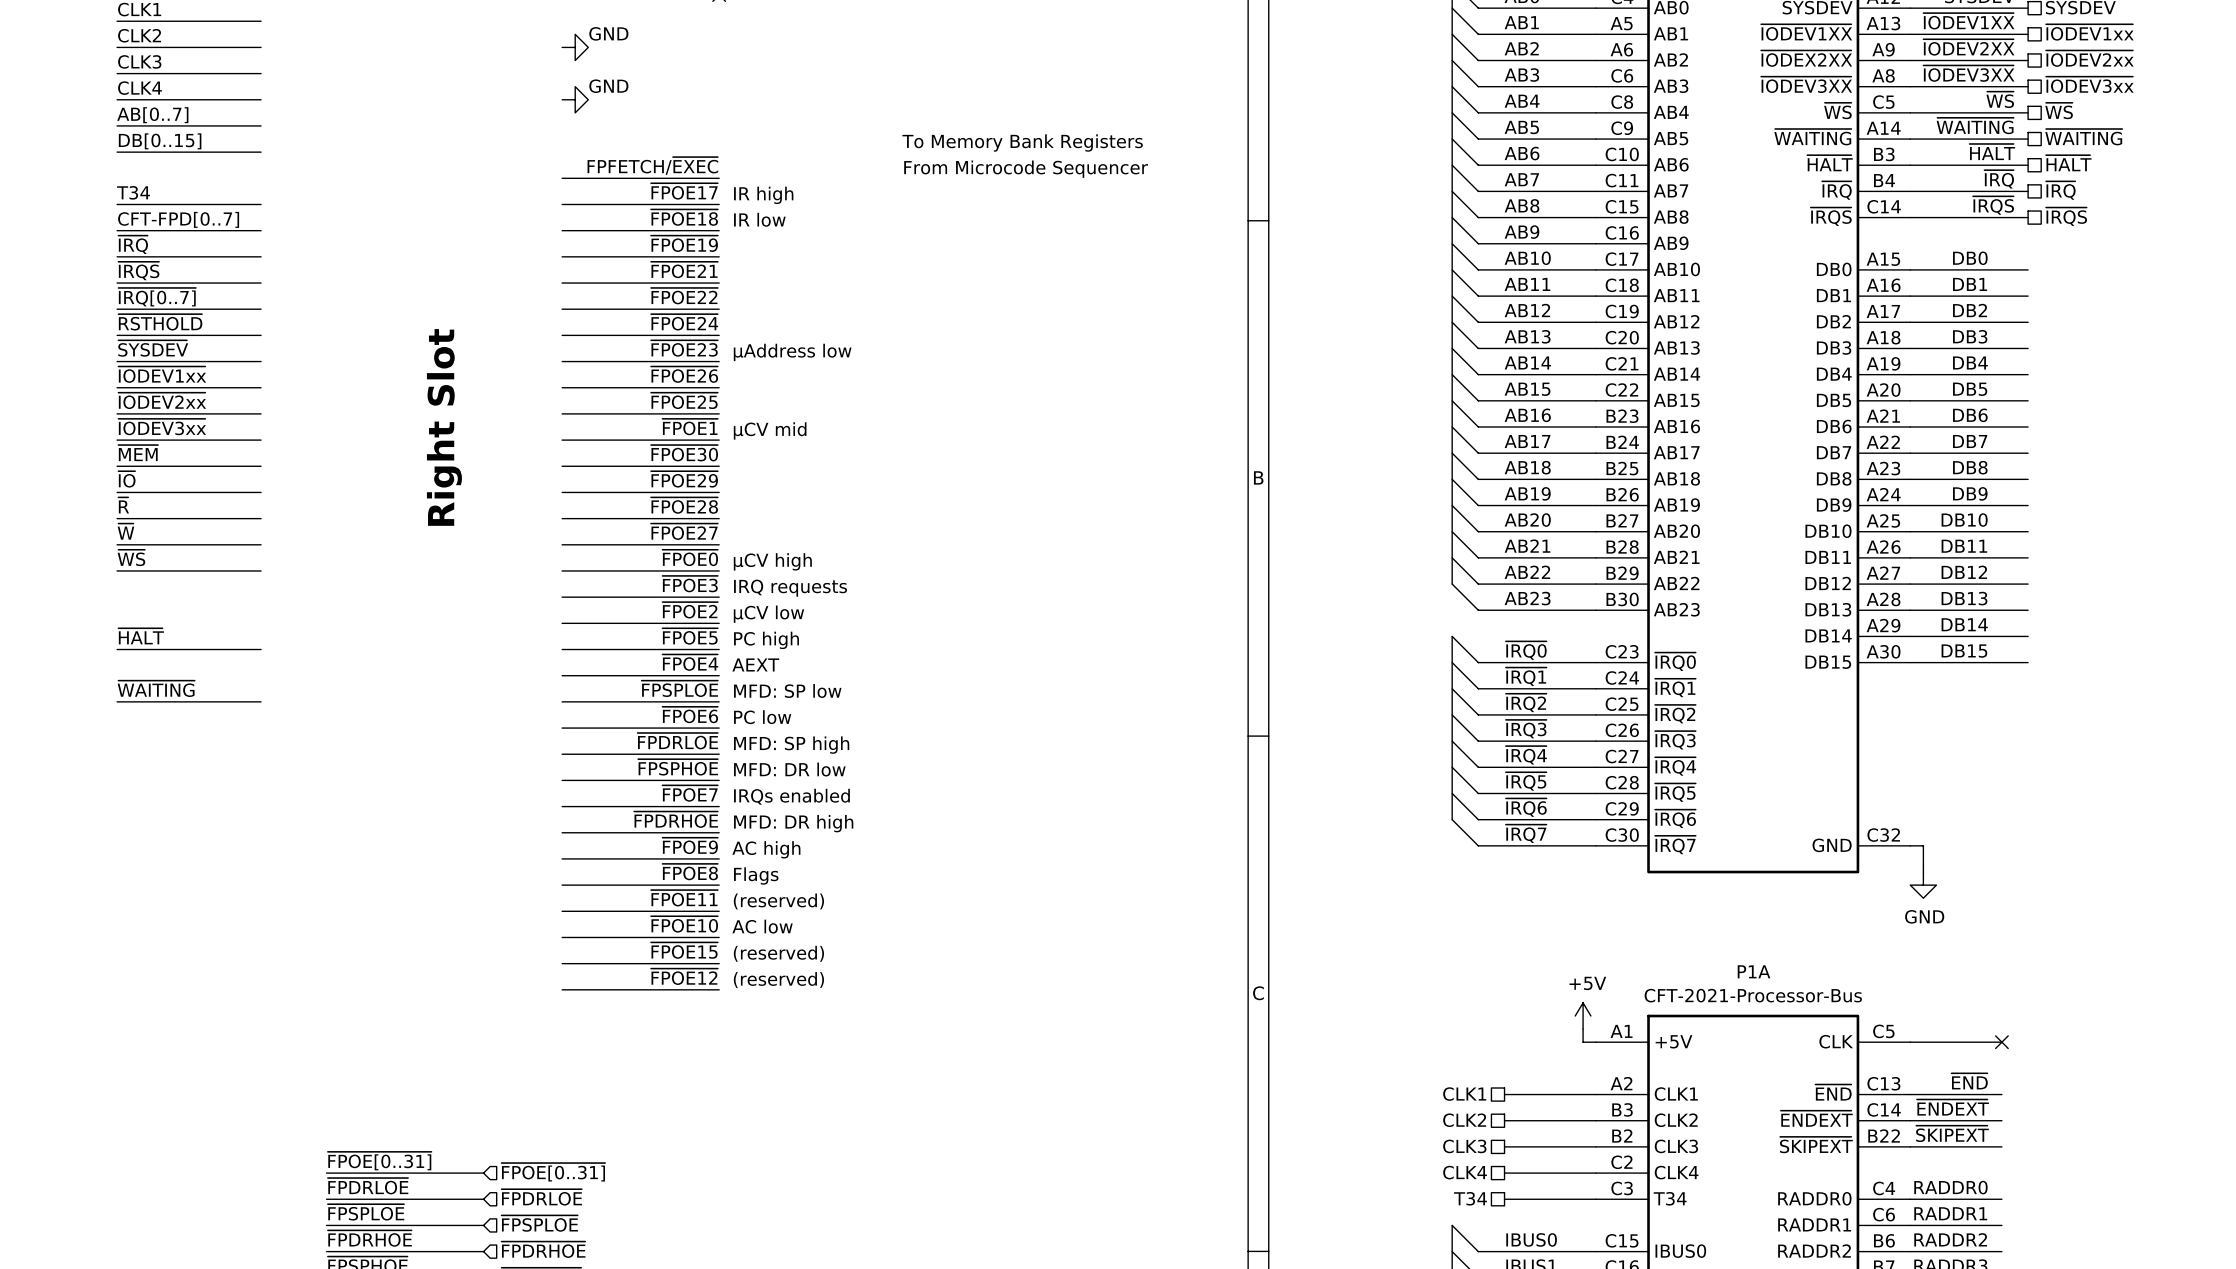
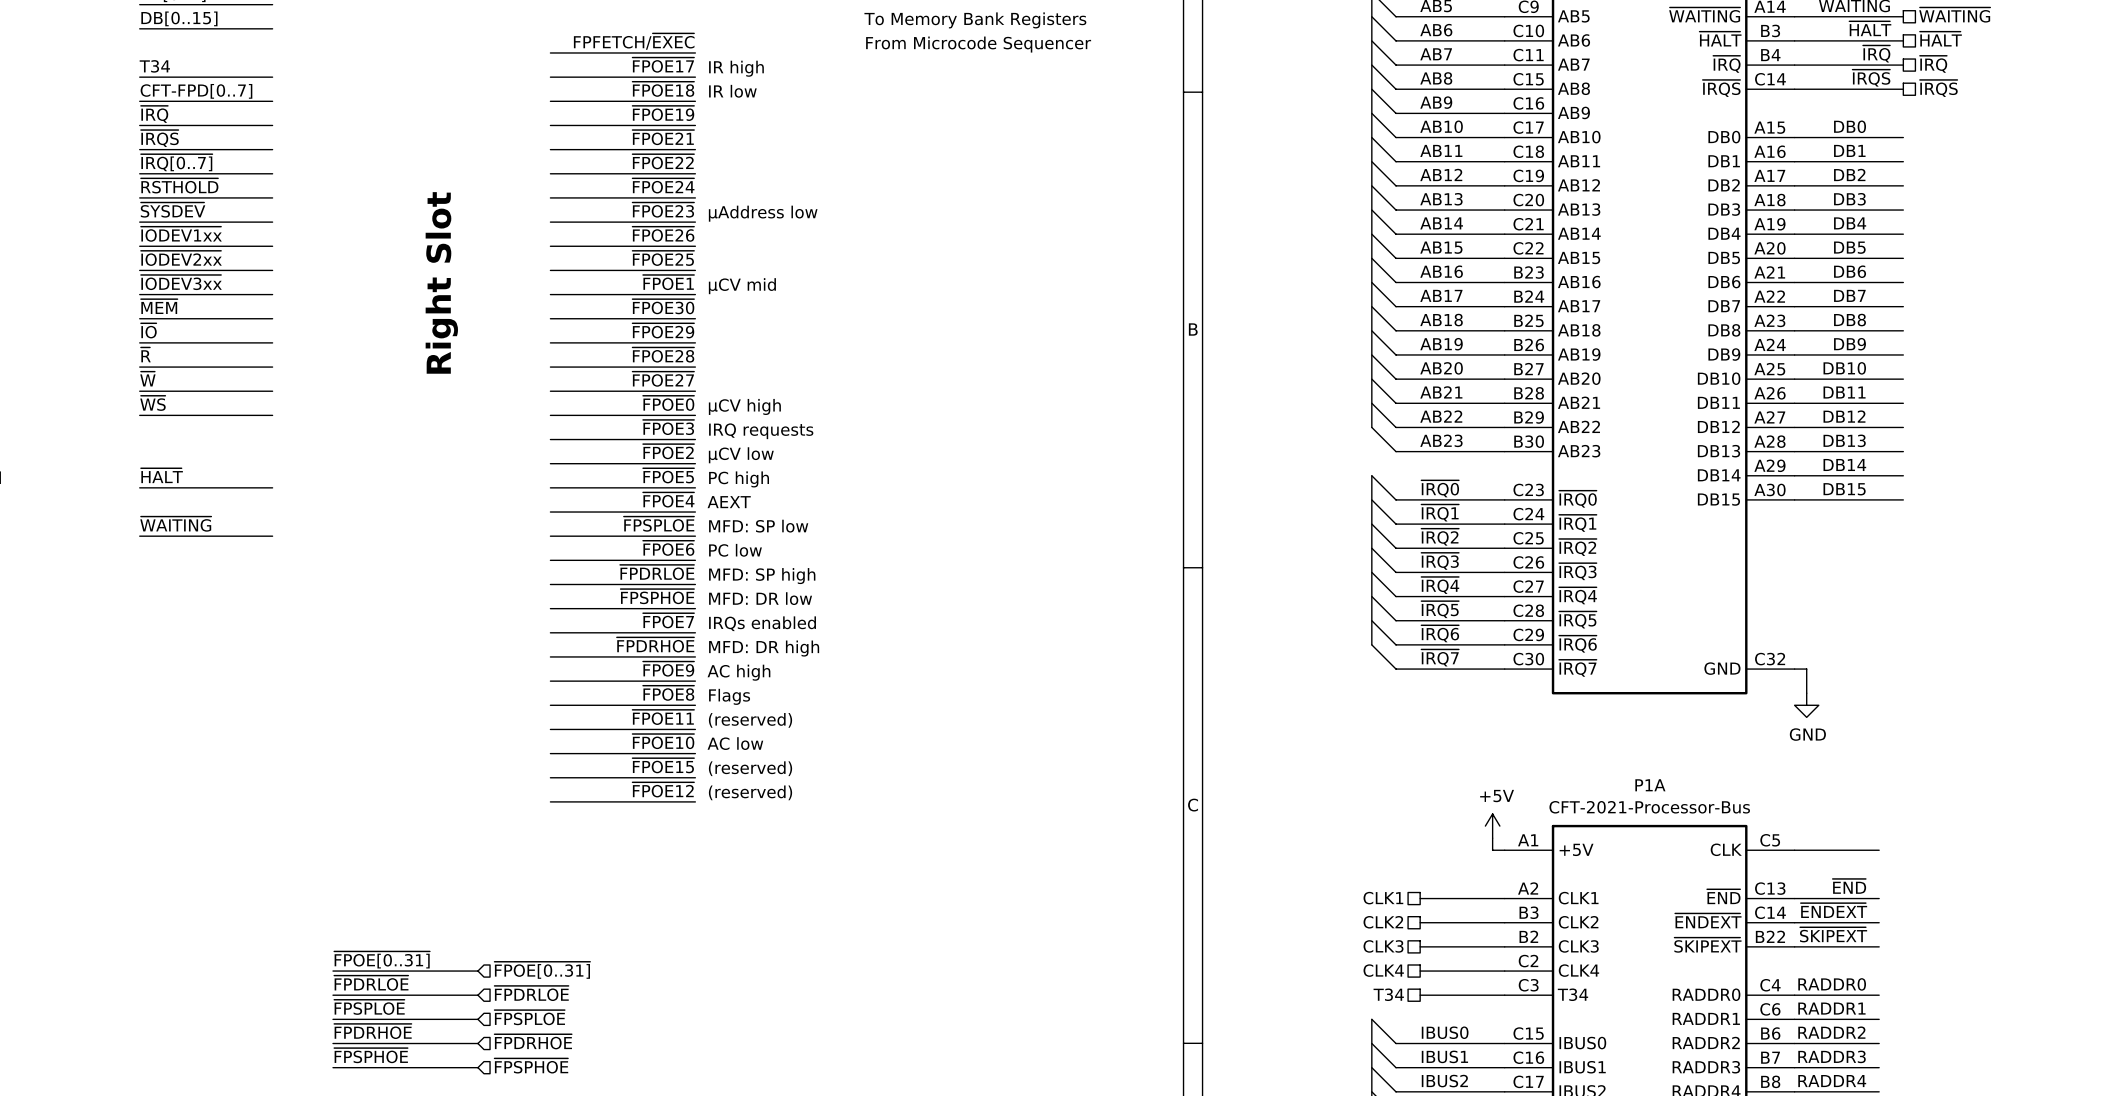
no-connect mark: (2001, 1042) -> none

